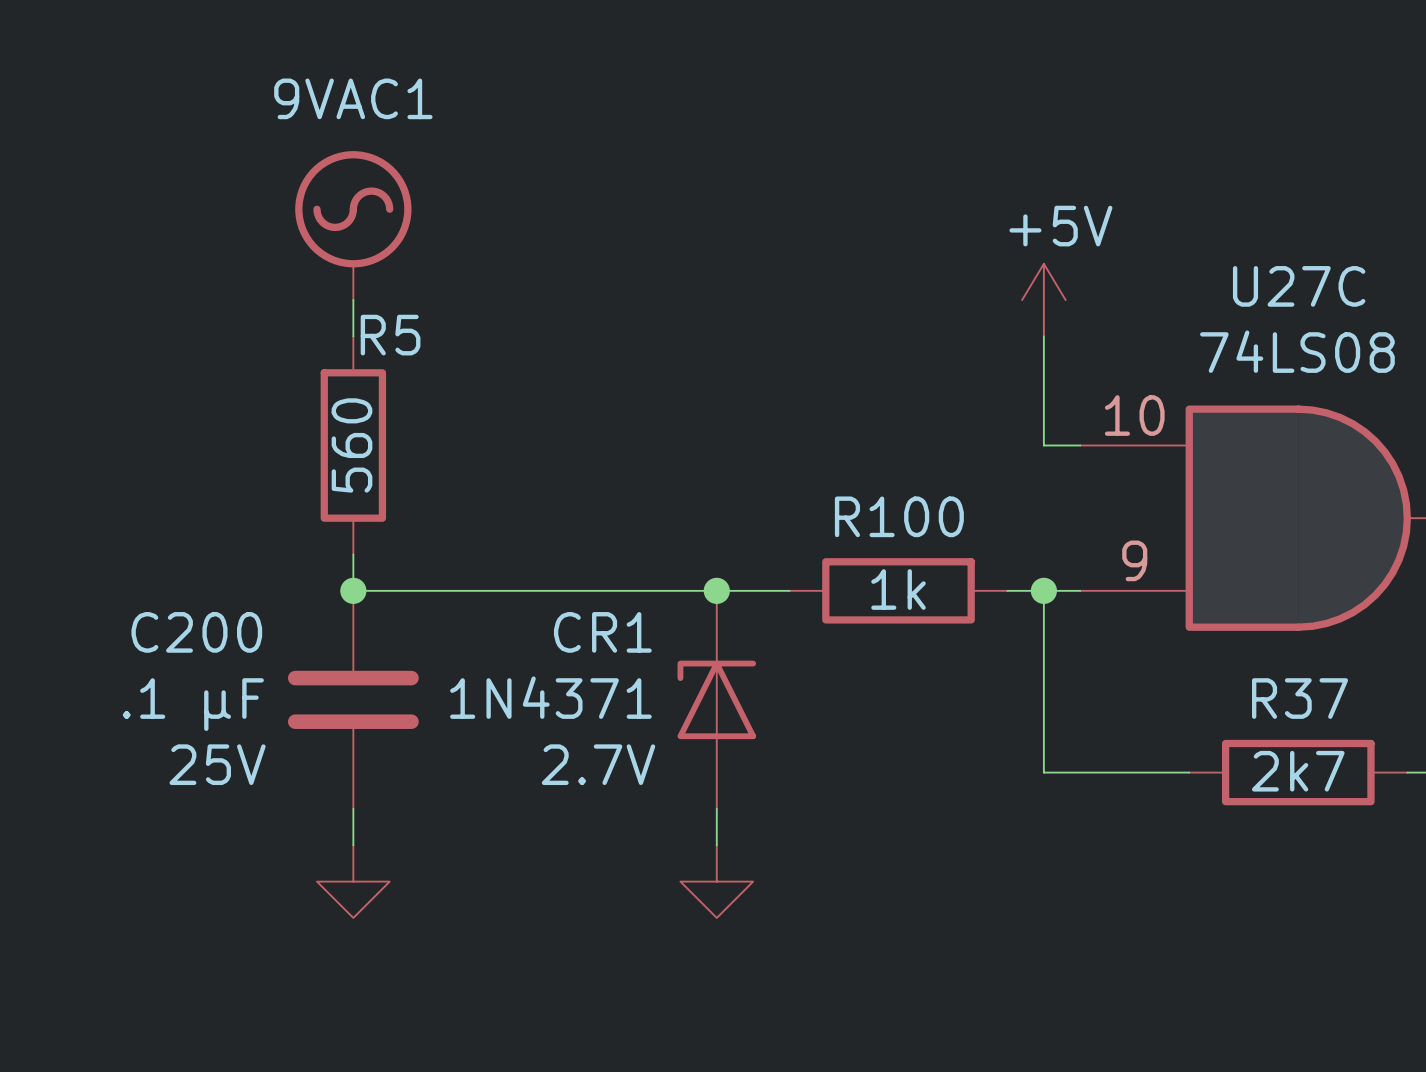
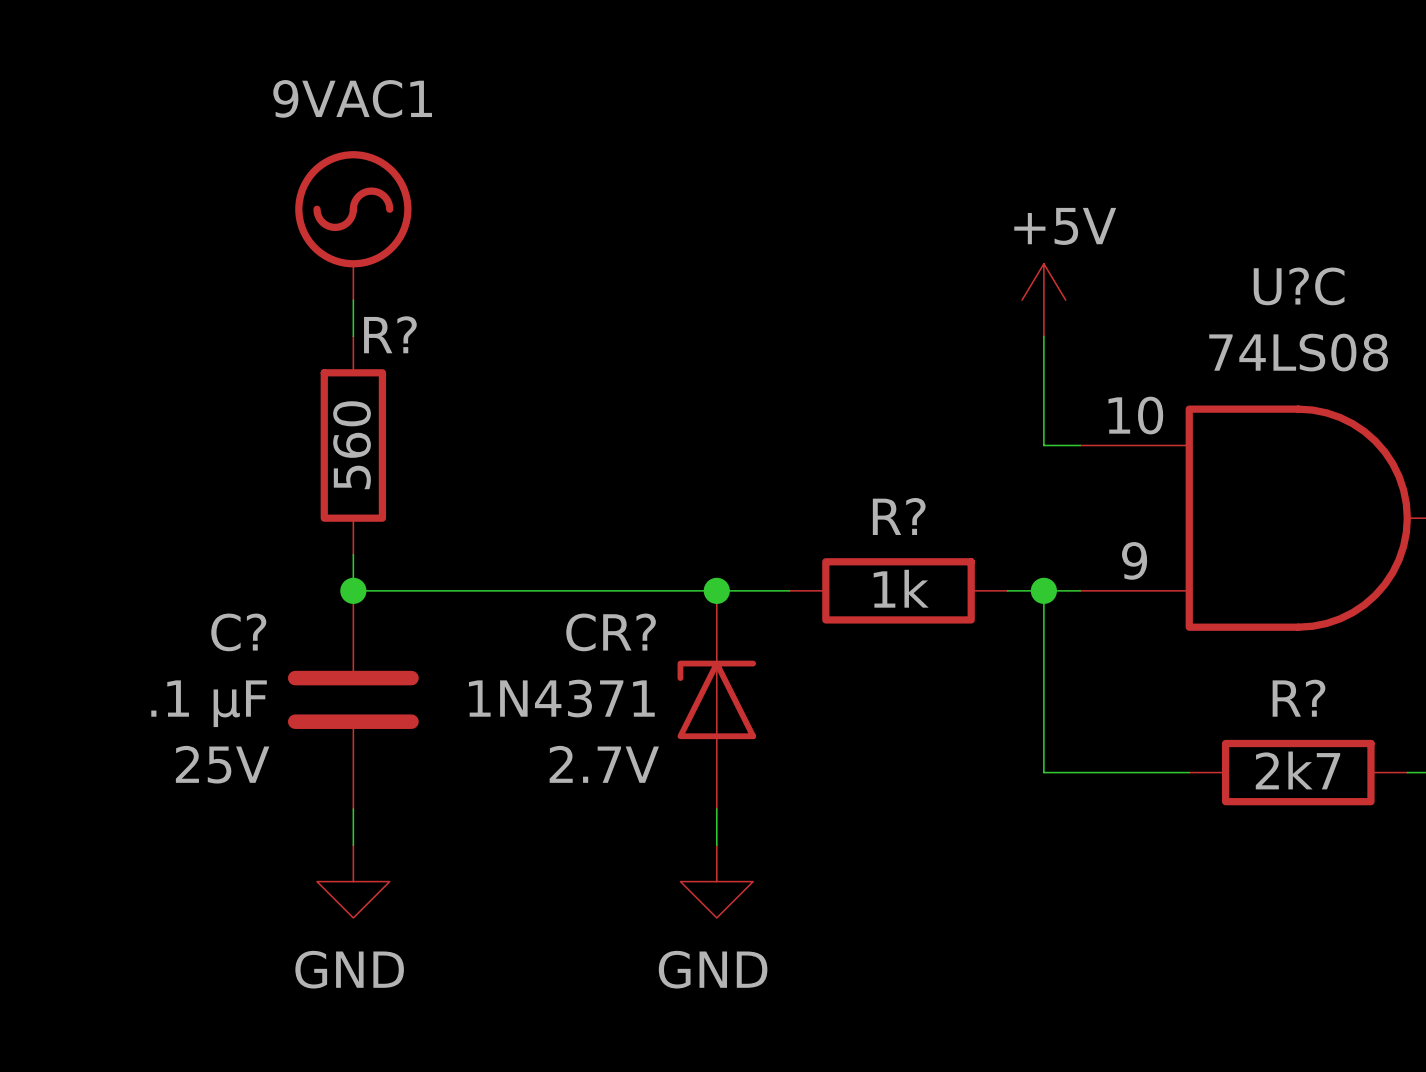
U27C name: U27C (1299, 286) -> U?C (1299, 286)
R5 name: R5 (390, 335) -> R? (390, 334)
R100 name: R100 (899, 516) -> R? (899, 516)
C200 name: C200 (196, 632) -> C? (238, 632)
CR1 name: CR1 (602, 632) -> CR? (611, 632)
R37 name: R37 (1300, 698) -> R? (1299, 698)
power symbol text: none -> GND (349, 969)
power symbol text: none -> GND (713, 969)

